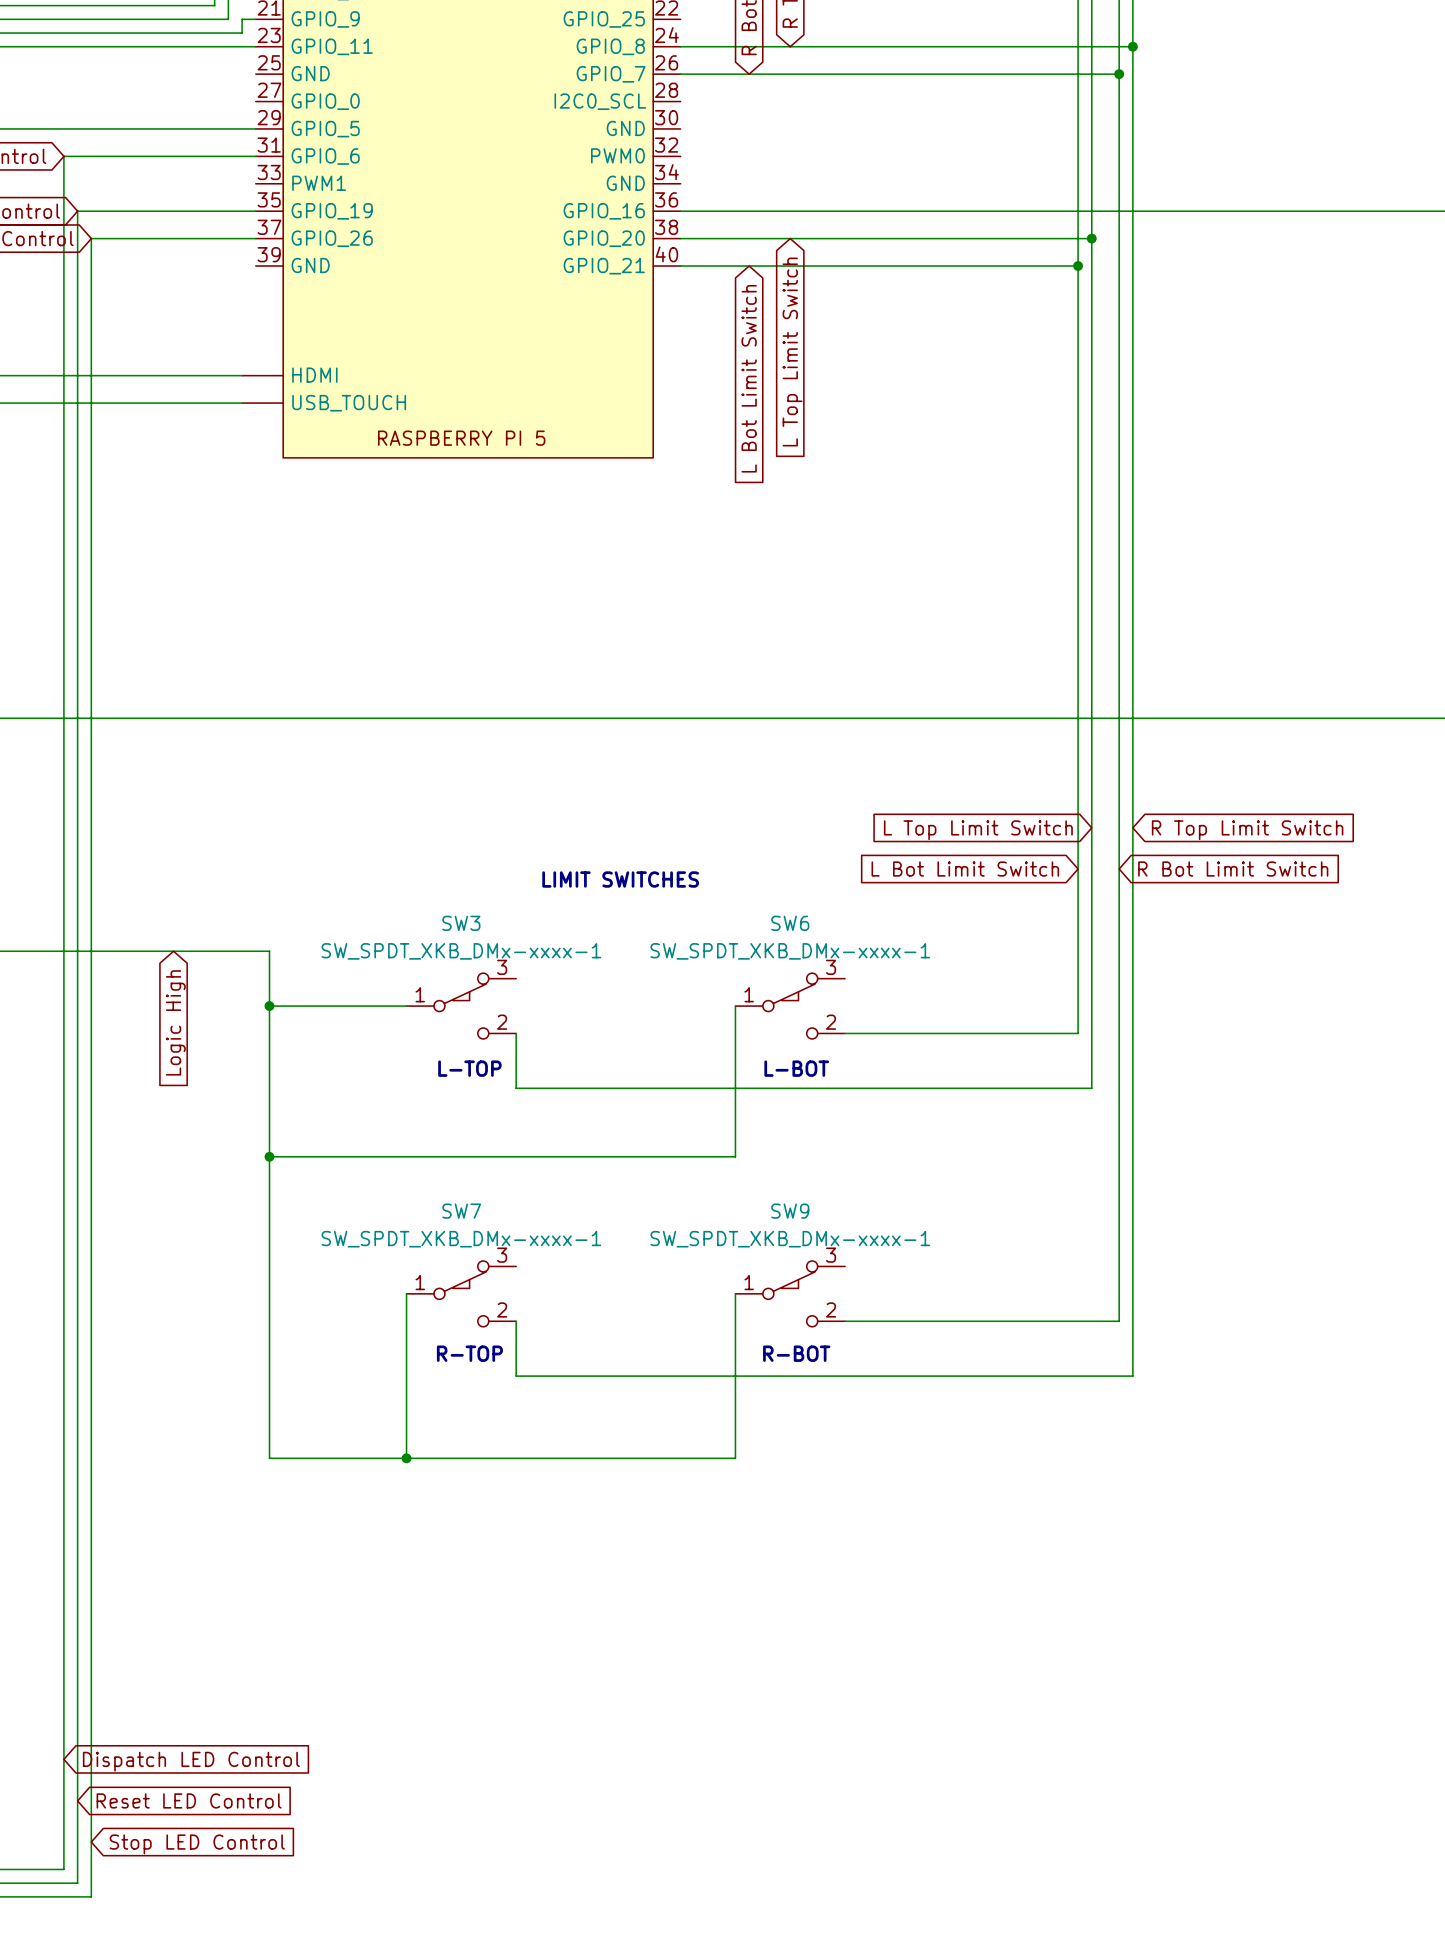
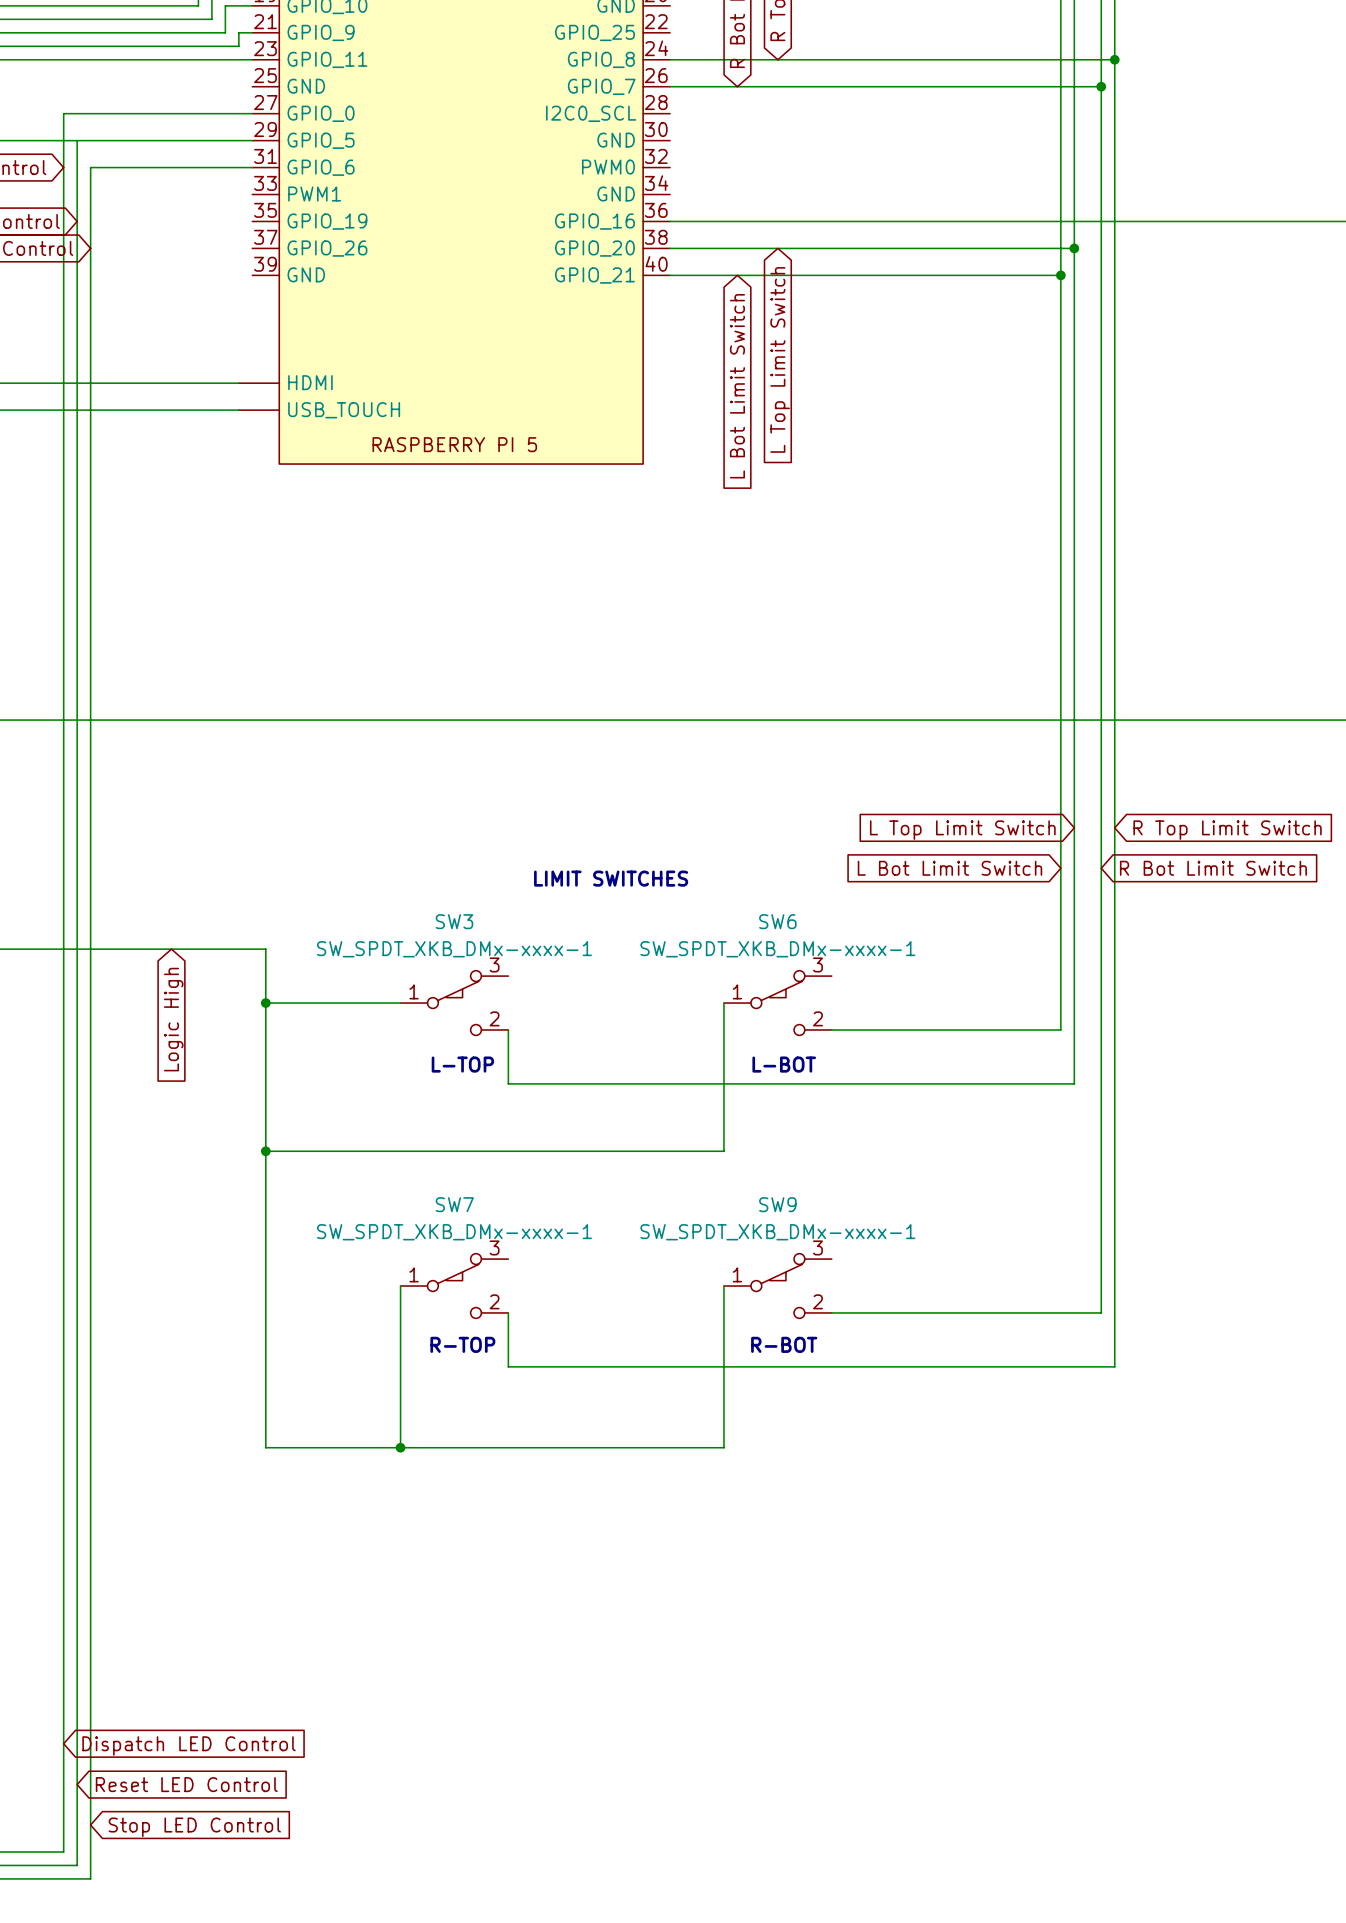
wire: none -> (252, 113) (63, 113) (63, 167)
wire: (63, 156) (91, 156) -> (90, 248) (90, 167)
wire: (77, 211) (255, 211) -> (77, 221) (77, 140)
wire: (91, 238) (255, 238) -> none

